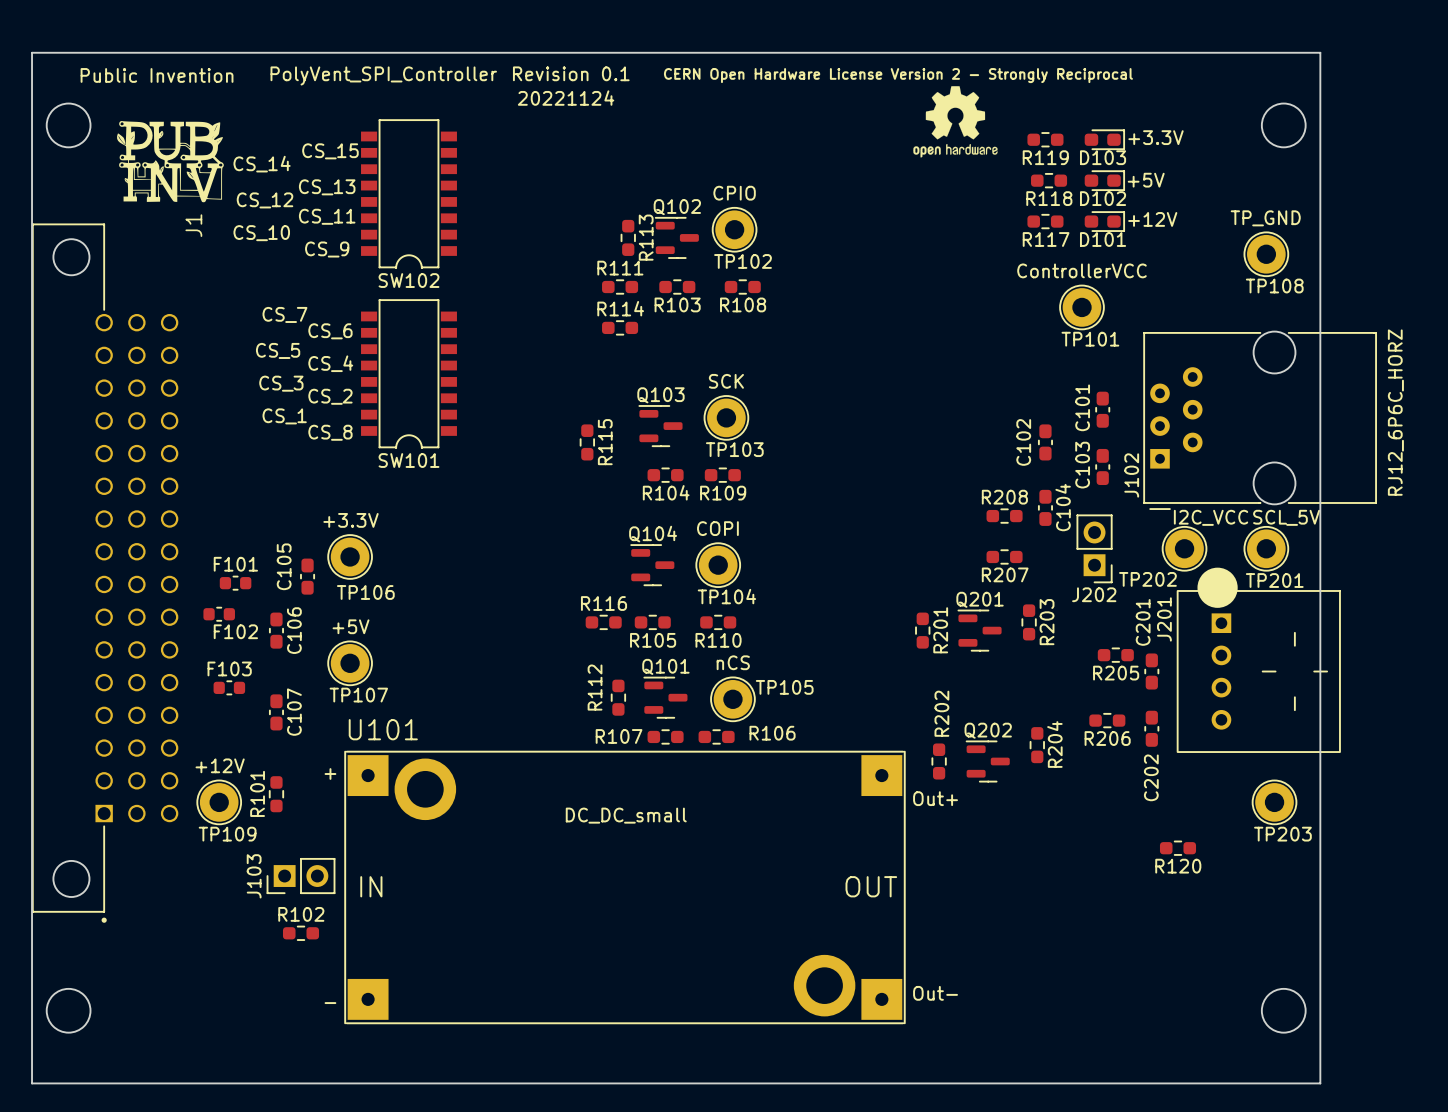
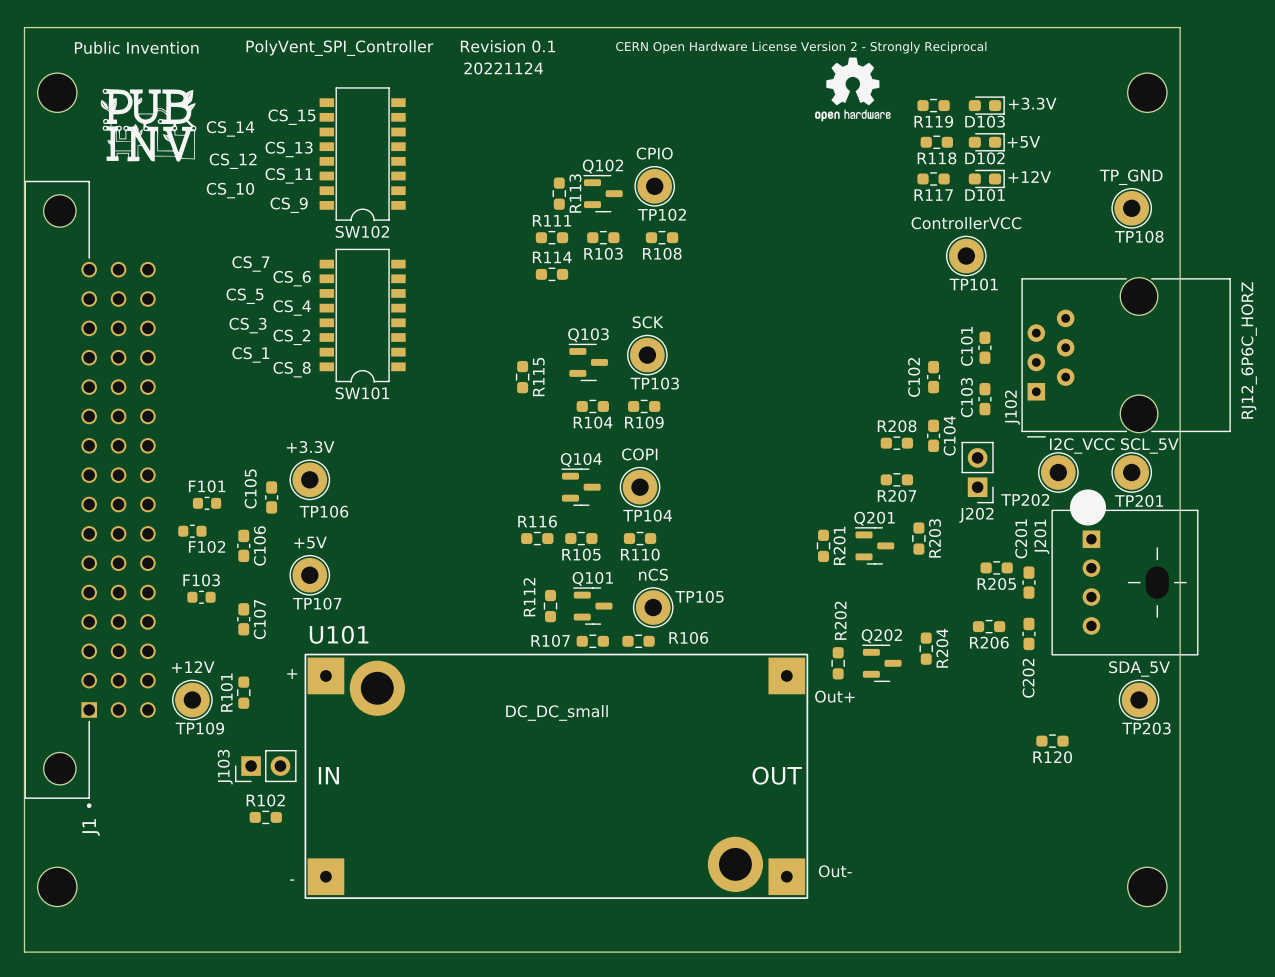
J1 name position: J1 (193, 225) -> J1 (91, 827)
TP203 value: none -> SDA_5V (1139, 668)

